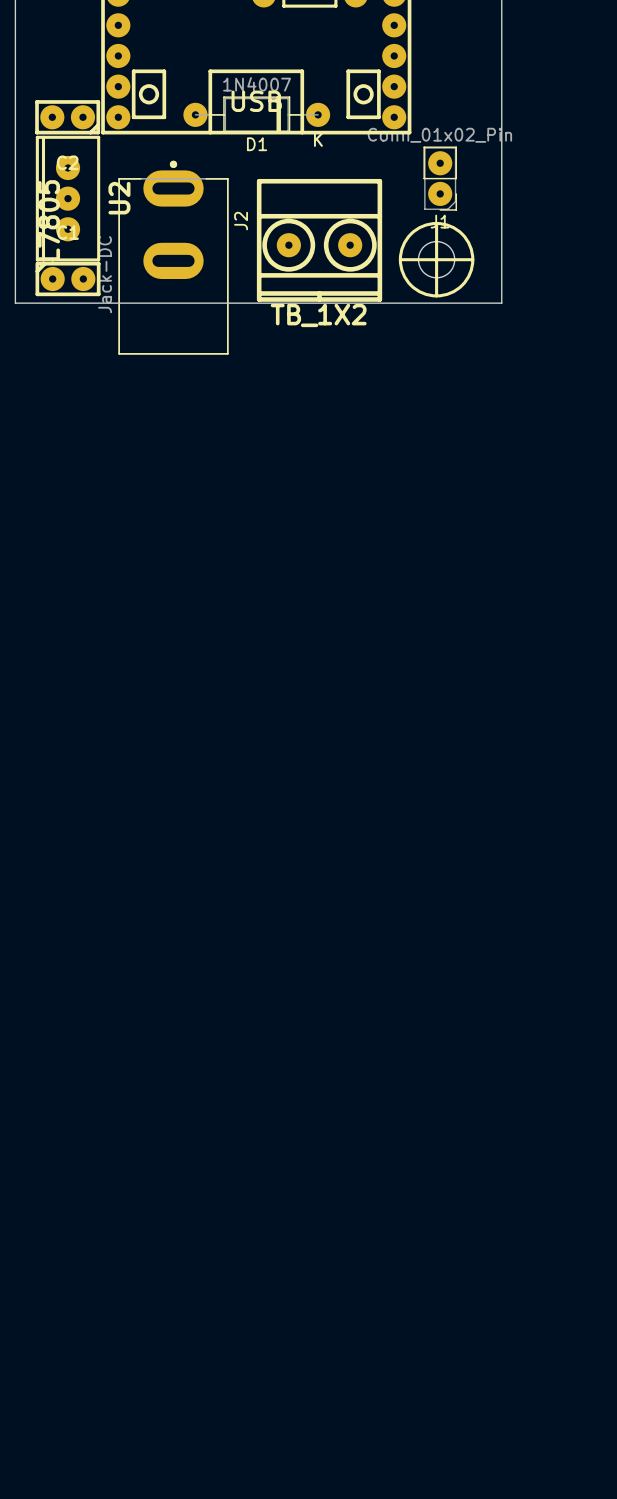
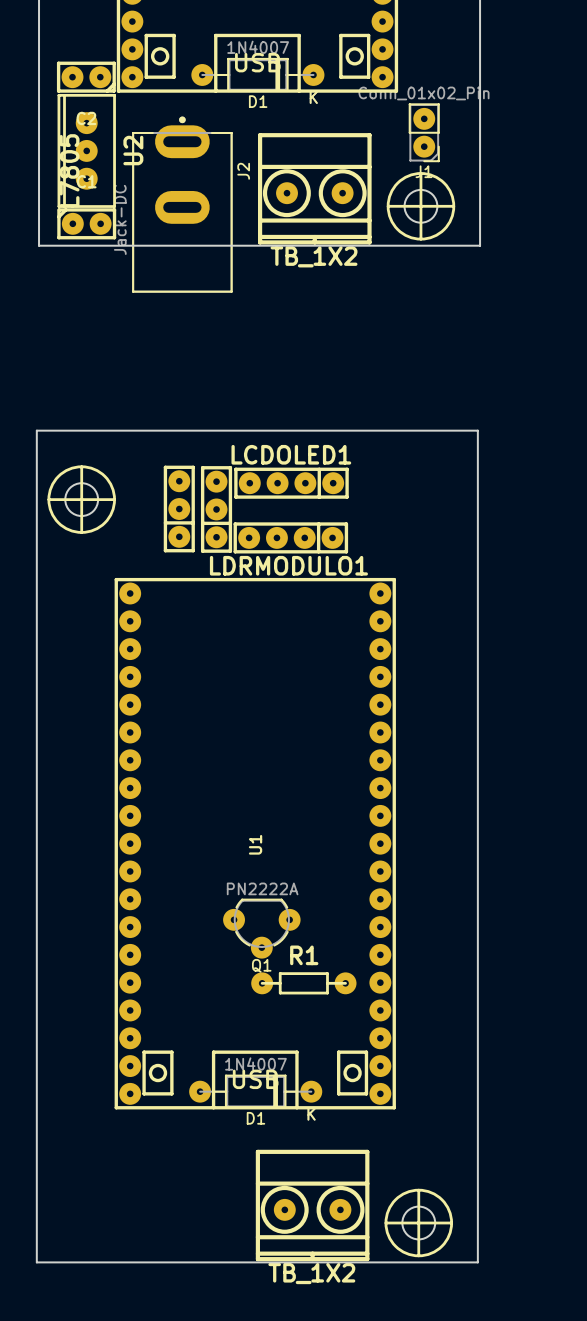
board edge: none -> (36, 430) (477, 430) (477, 1262) (36, 1262) (36, 430)
LCDOLED1: none -> (291, 483)
part: none -> (81, 499)
part: none -> (179, 509)
part: none -> (216, 509)
LDRMODULO1: none -> (290, 537)
U1: none -> (255, 843)
Q1: none -> PN2222A (261, 928)
R1: none -> (303, 983)
D1: none -> 1N4007 (255, 1091)
part: none -> TB_1X2 (312, 1205)
part: none -> (418, 1223)

